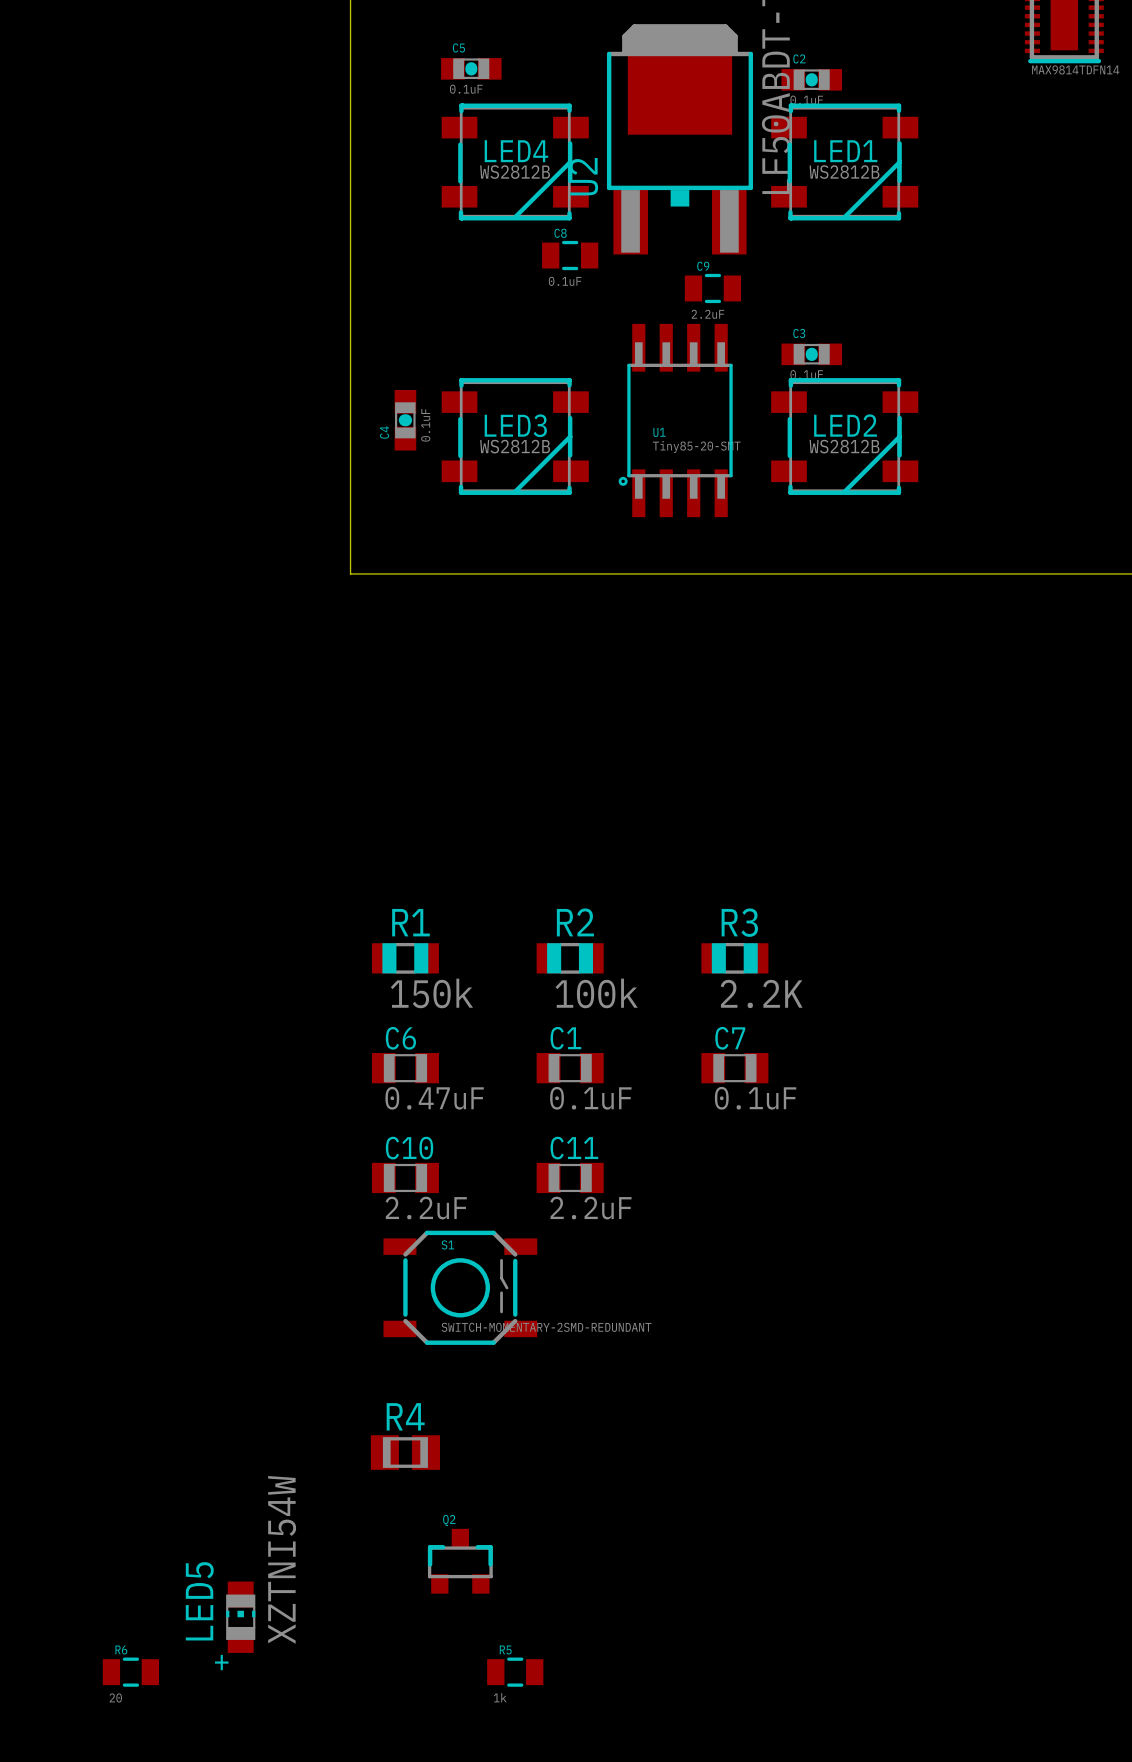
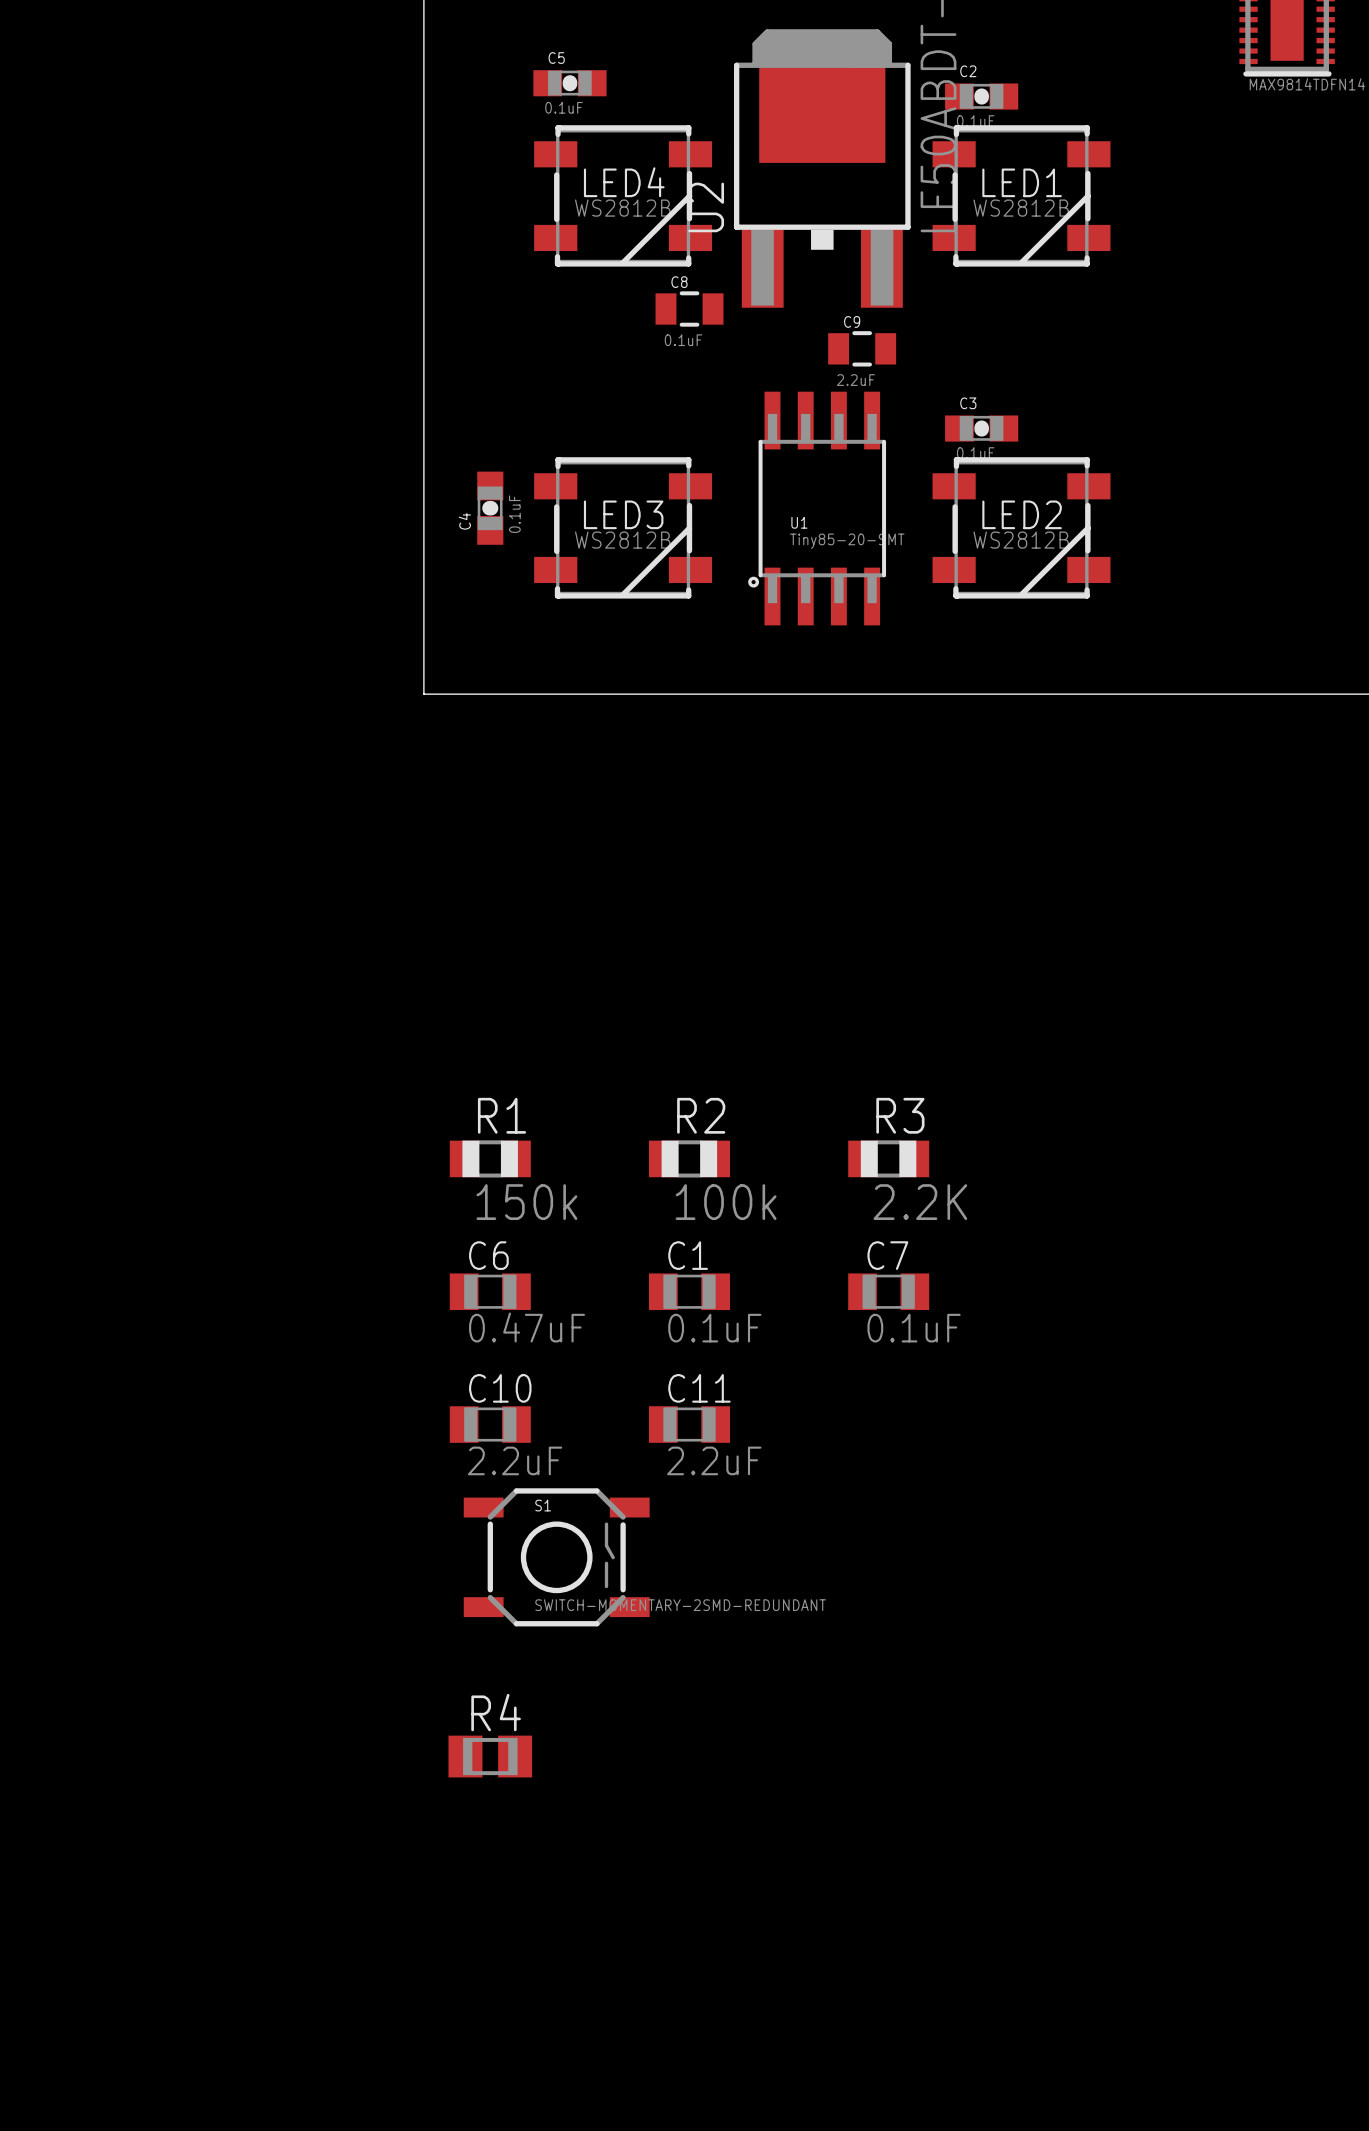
Q2: (460, 1561) -> none
LED5: XZTNI54W (240, 1617) -> none
R6: 20 (130, 1672) -> none
R5: 1k (515, 1672) -> none

